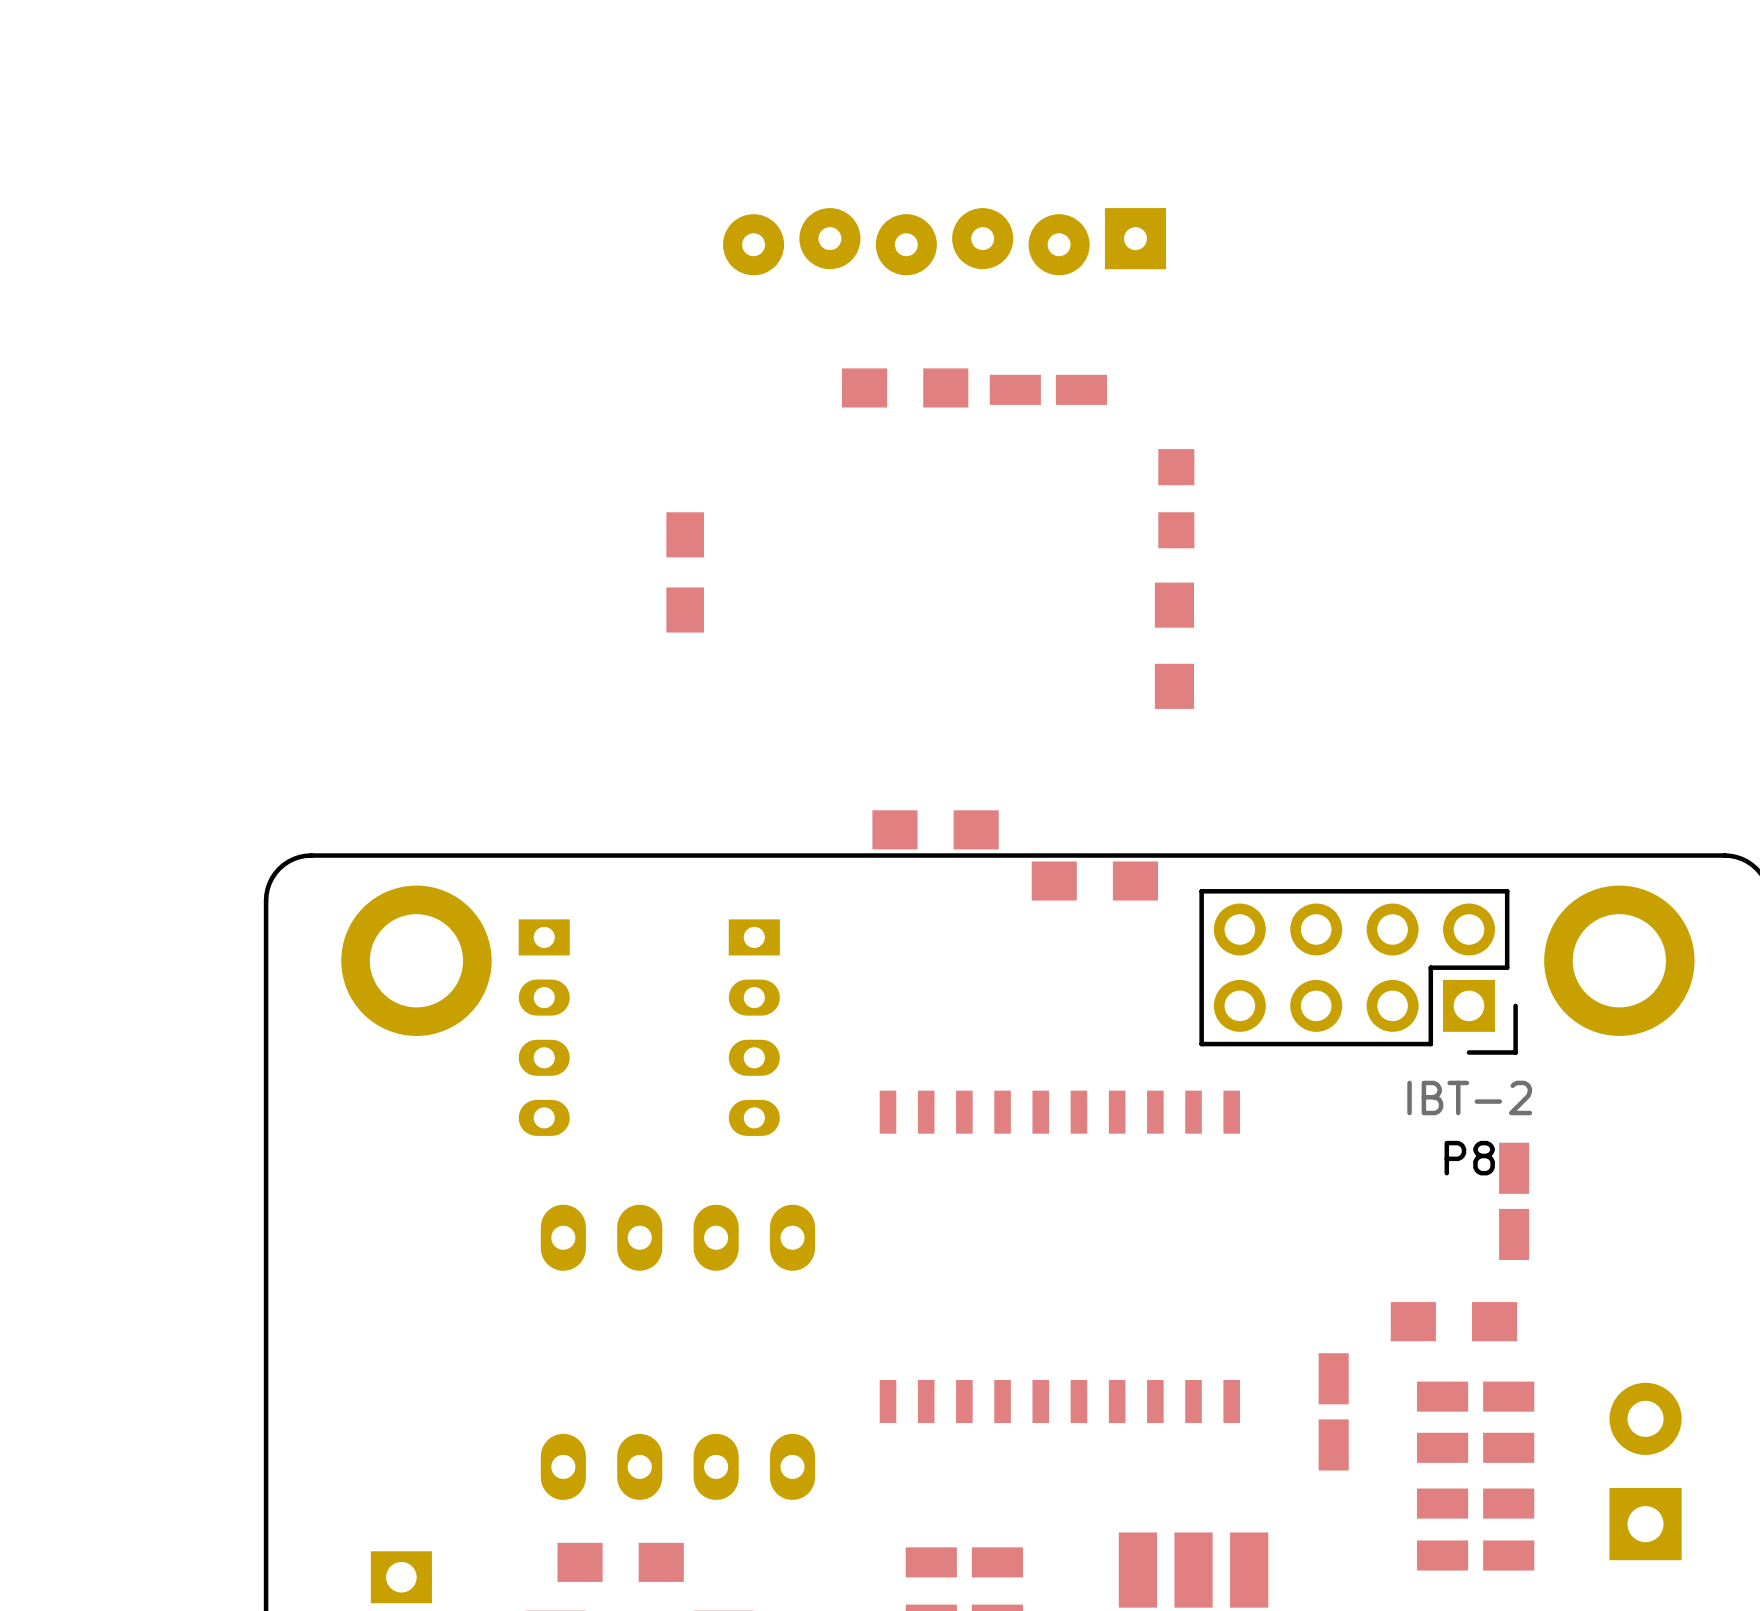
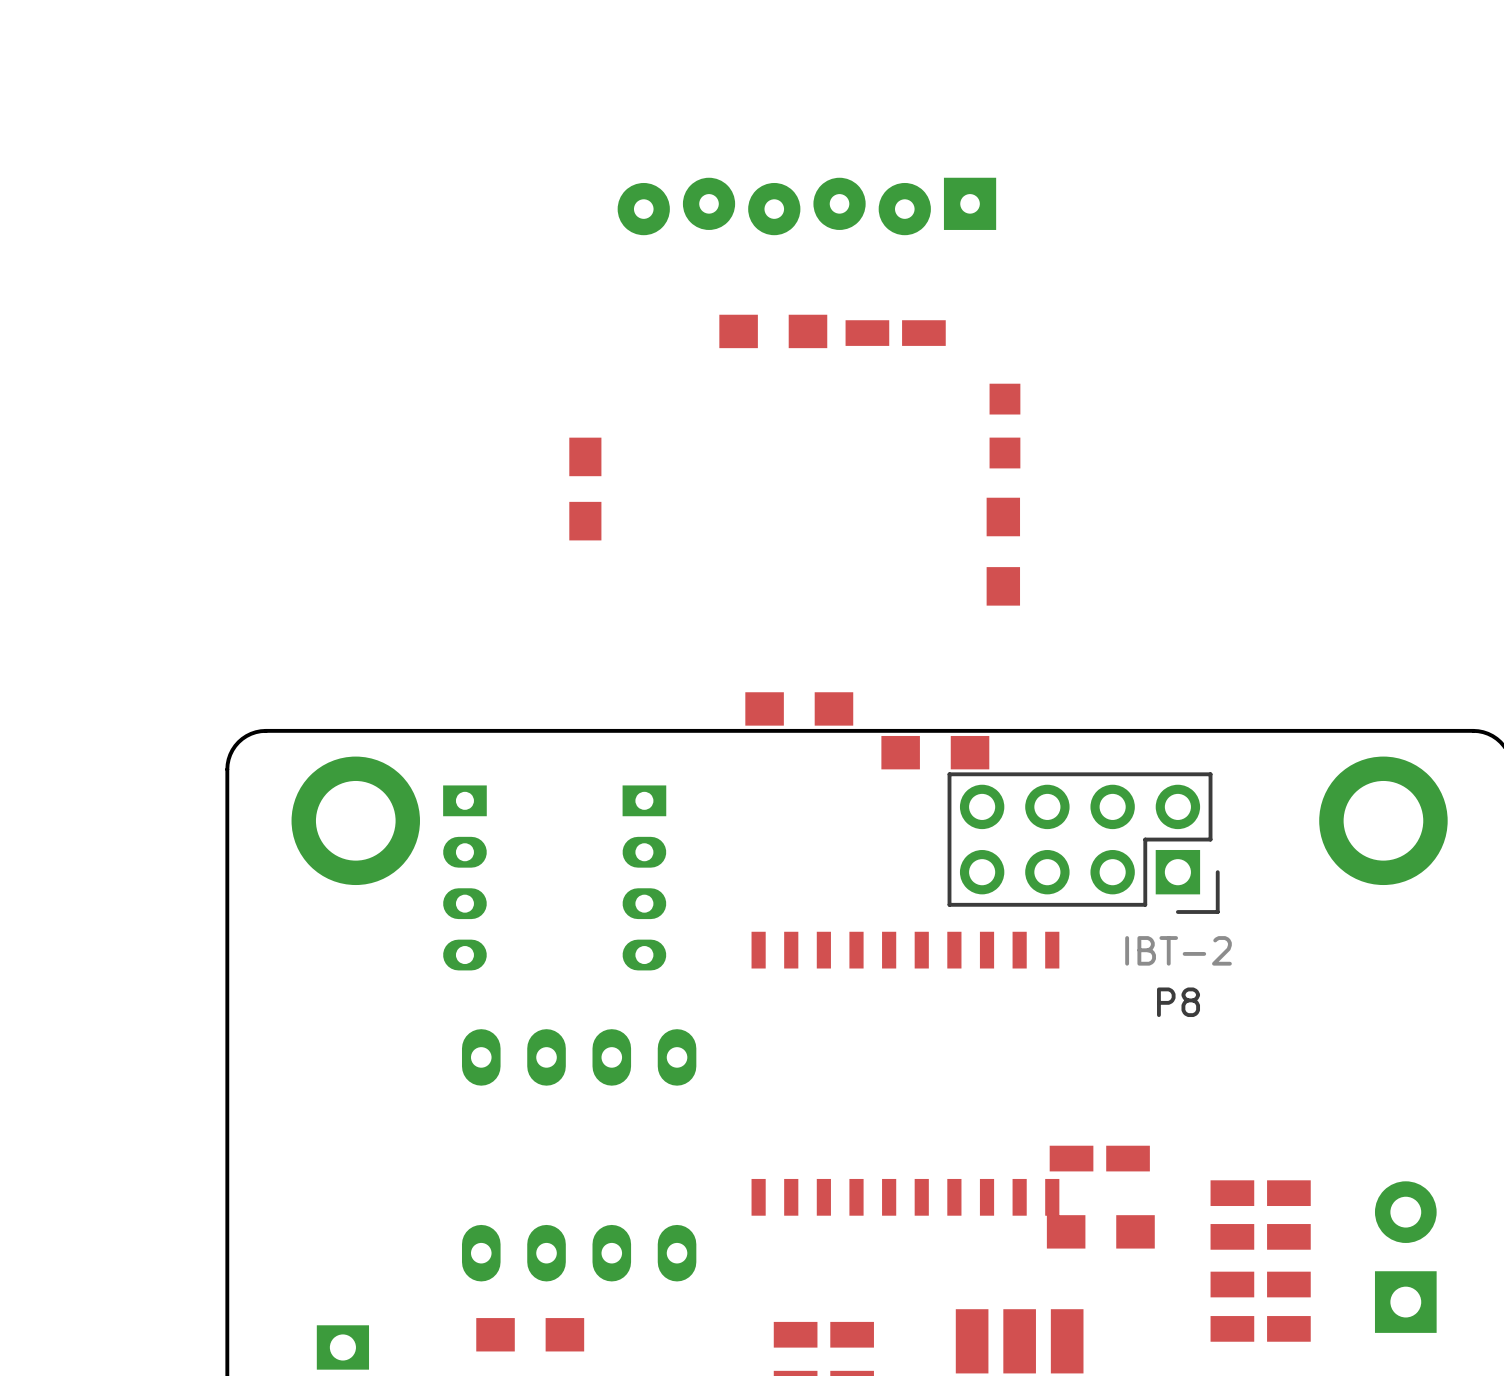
P8 position: (1358, 971) -> (1083, 843)
part: (1514, 1201) -> none
part position: (1453, 1321) -> (1100, 1231)
part rotation: 0° (1333, 1411) -> 90° clockwise (1099, 1158)
part position: (1333, 1411) -> (1099, 1158)

